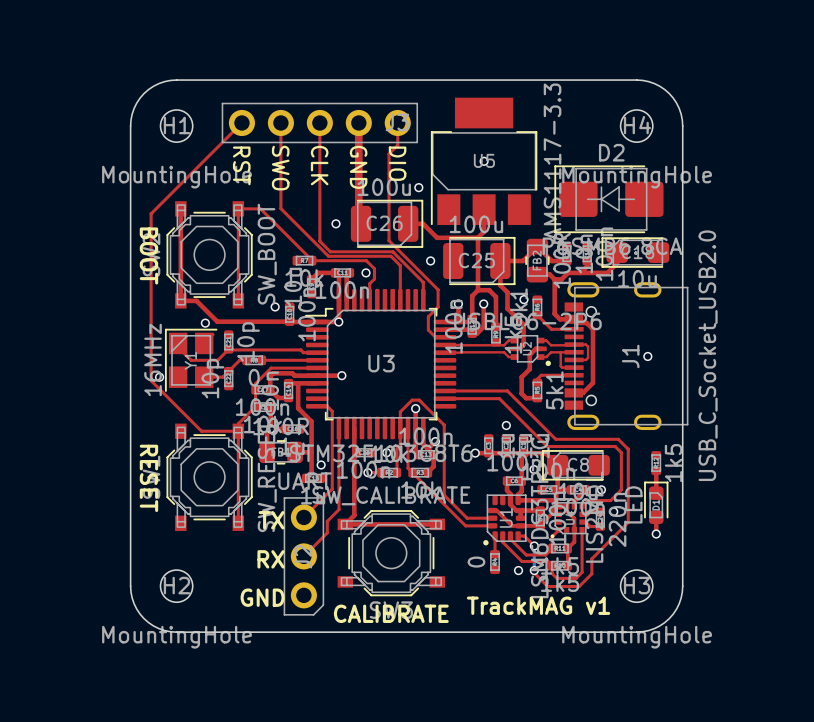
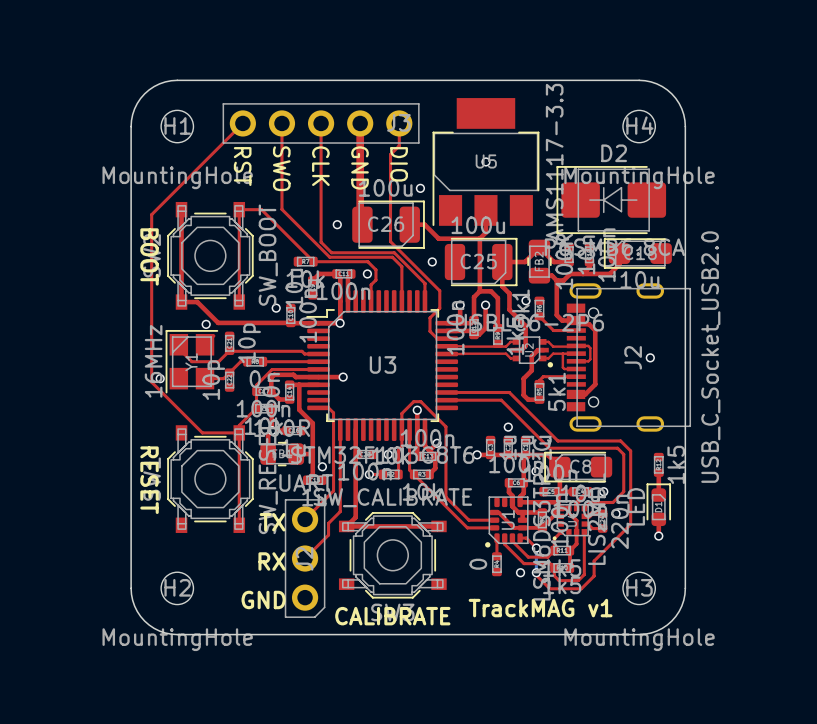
J1 name: J1 (630, 356) -> J2 (633, 357)

